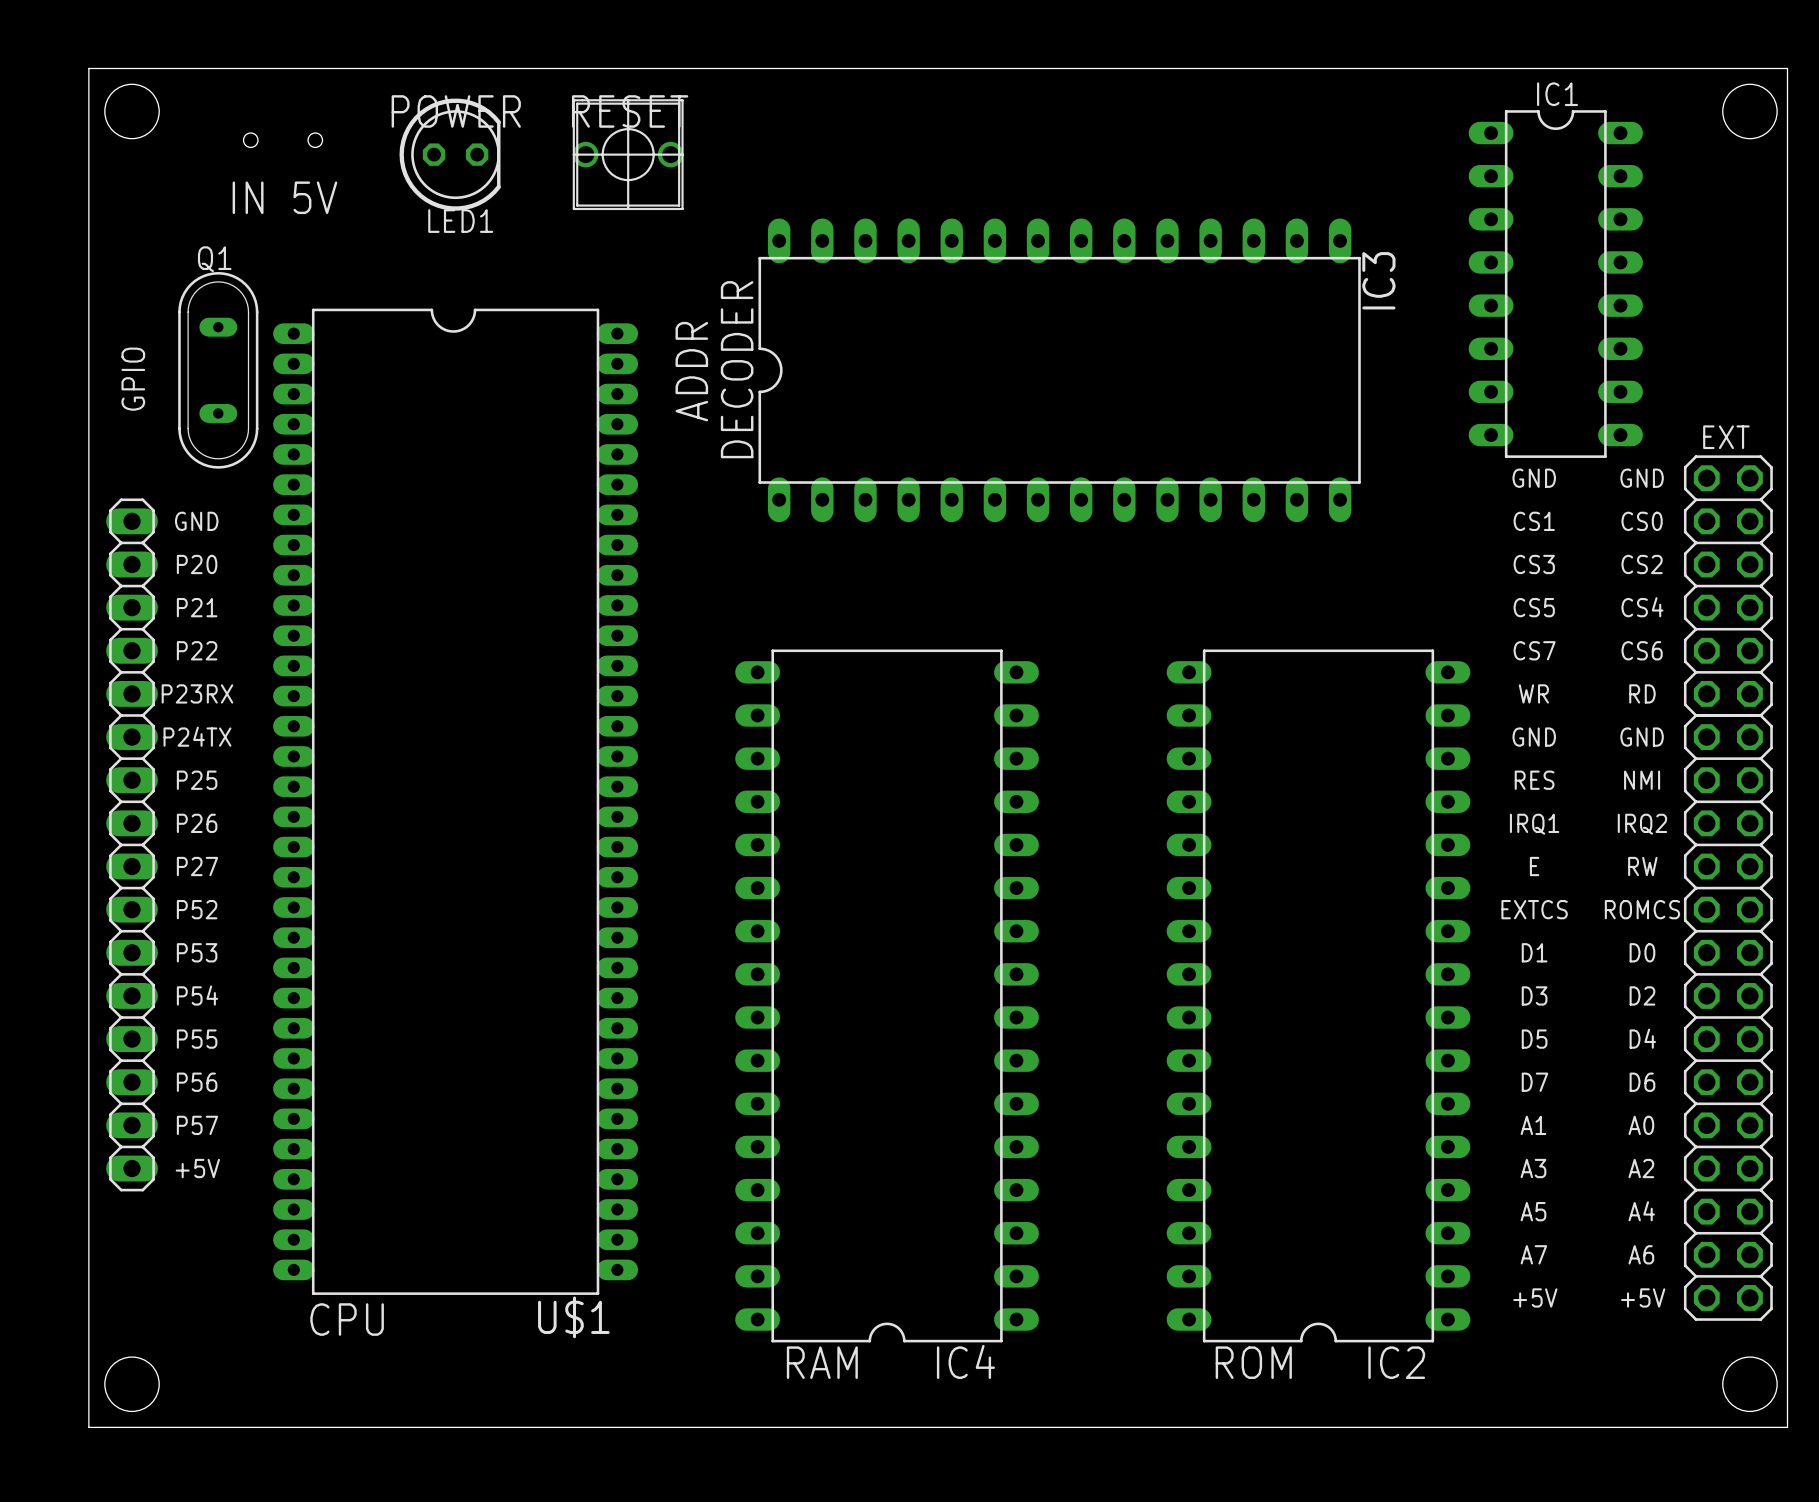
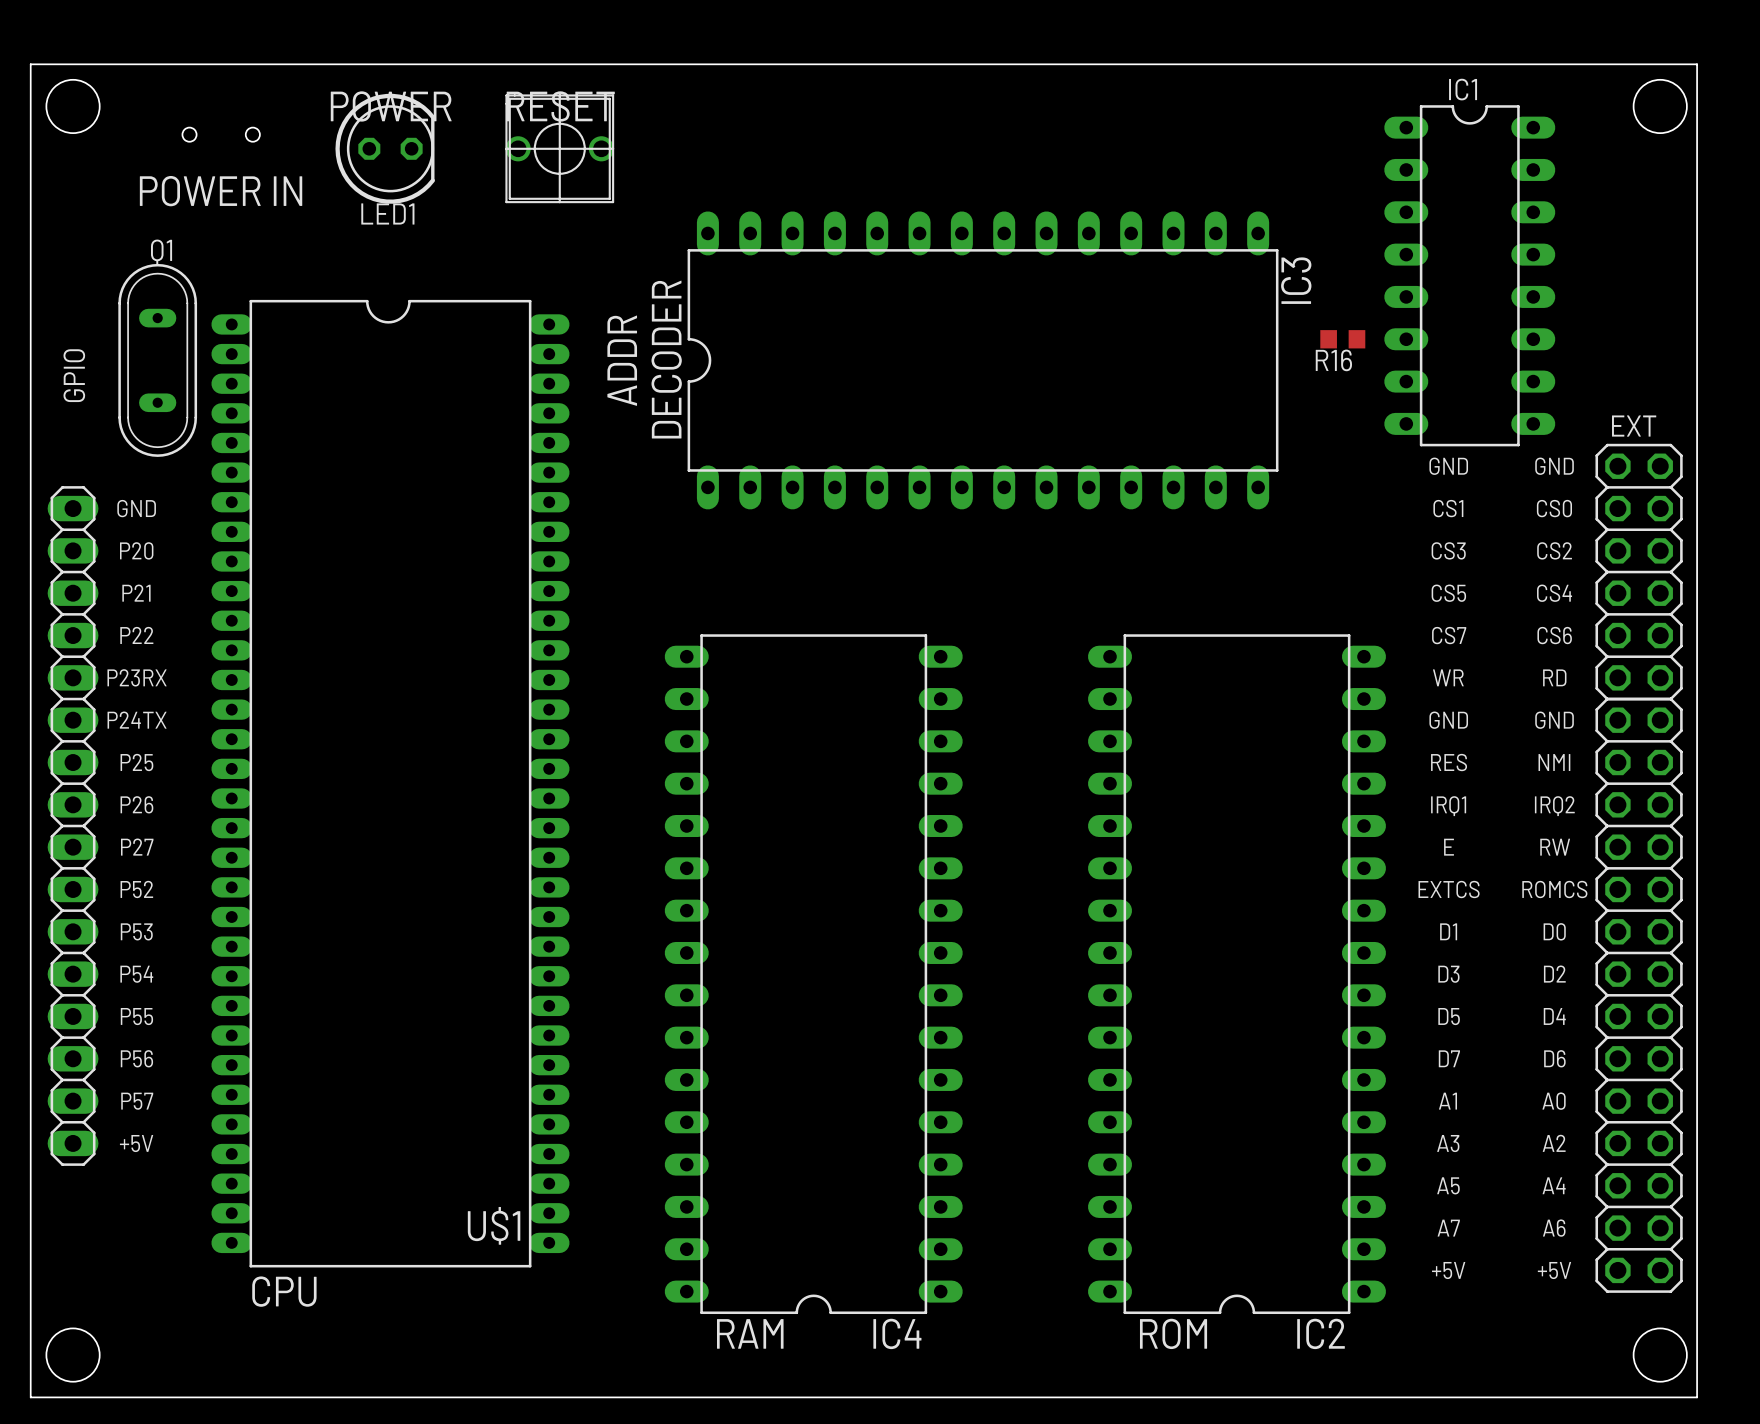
text: IN 5V (284, 197) -> POWER IN (221, 191)
R16: none -> (1342, 339)
U$1 name position: U$1 (573, 1317) -> U$1 (494, 1225)

